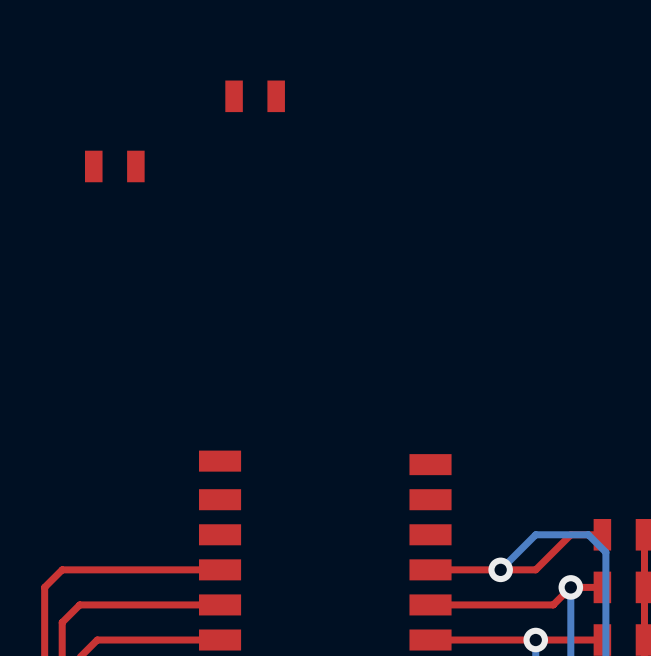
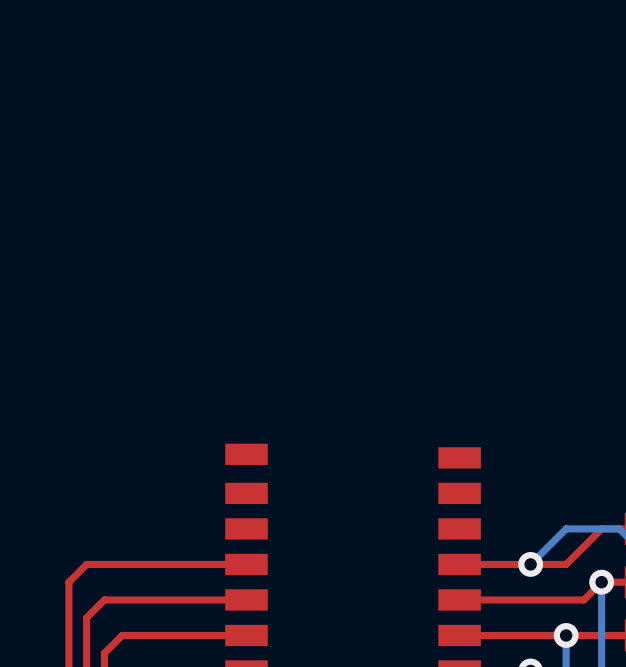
part: (255, 96) -> none
part: (114, 166) -> none

